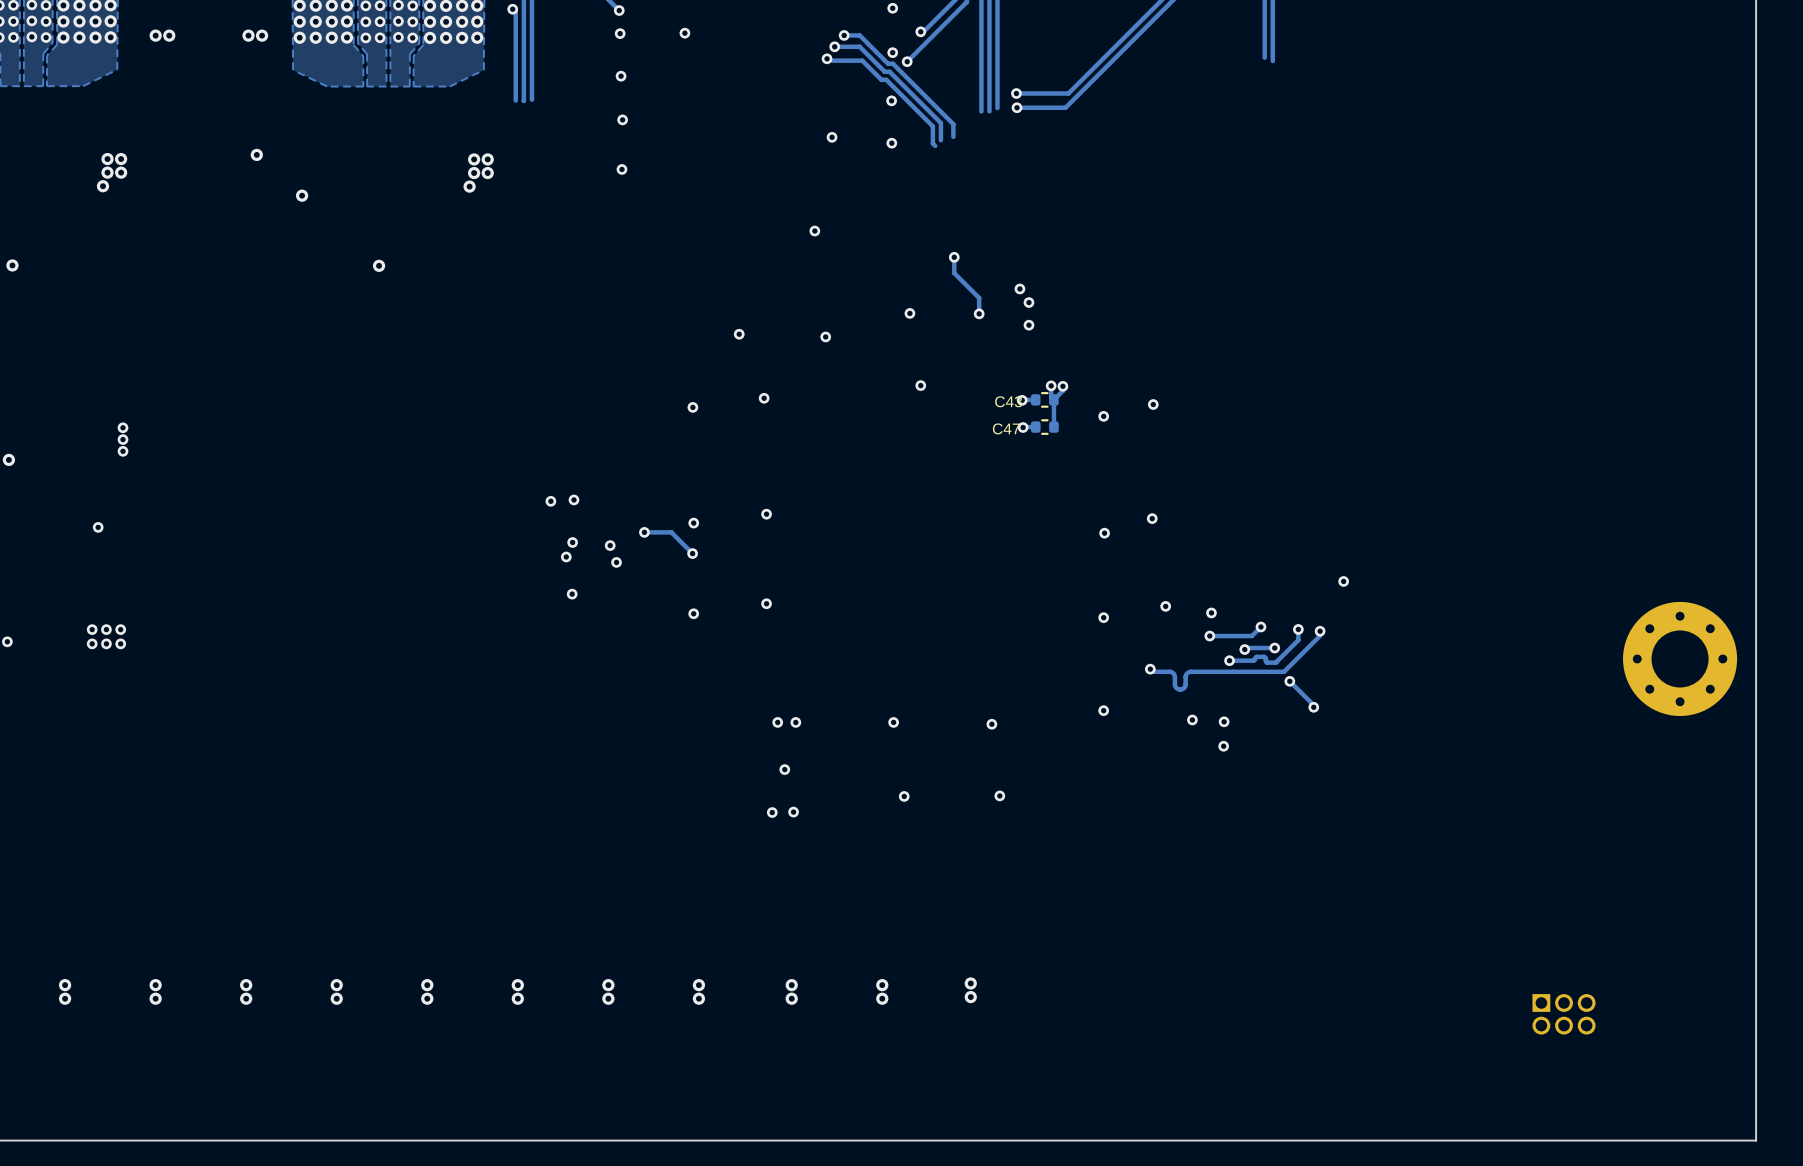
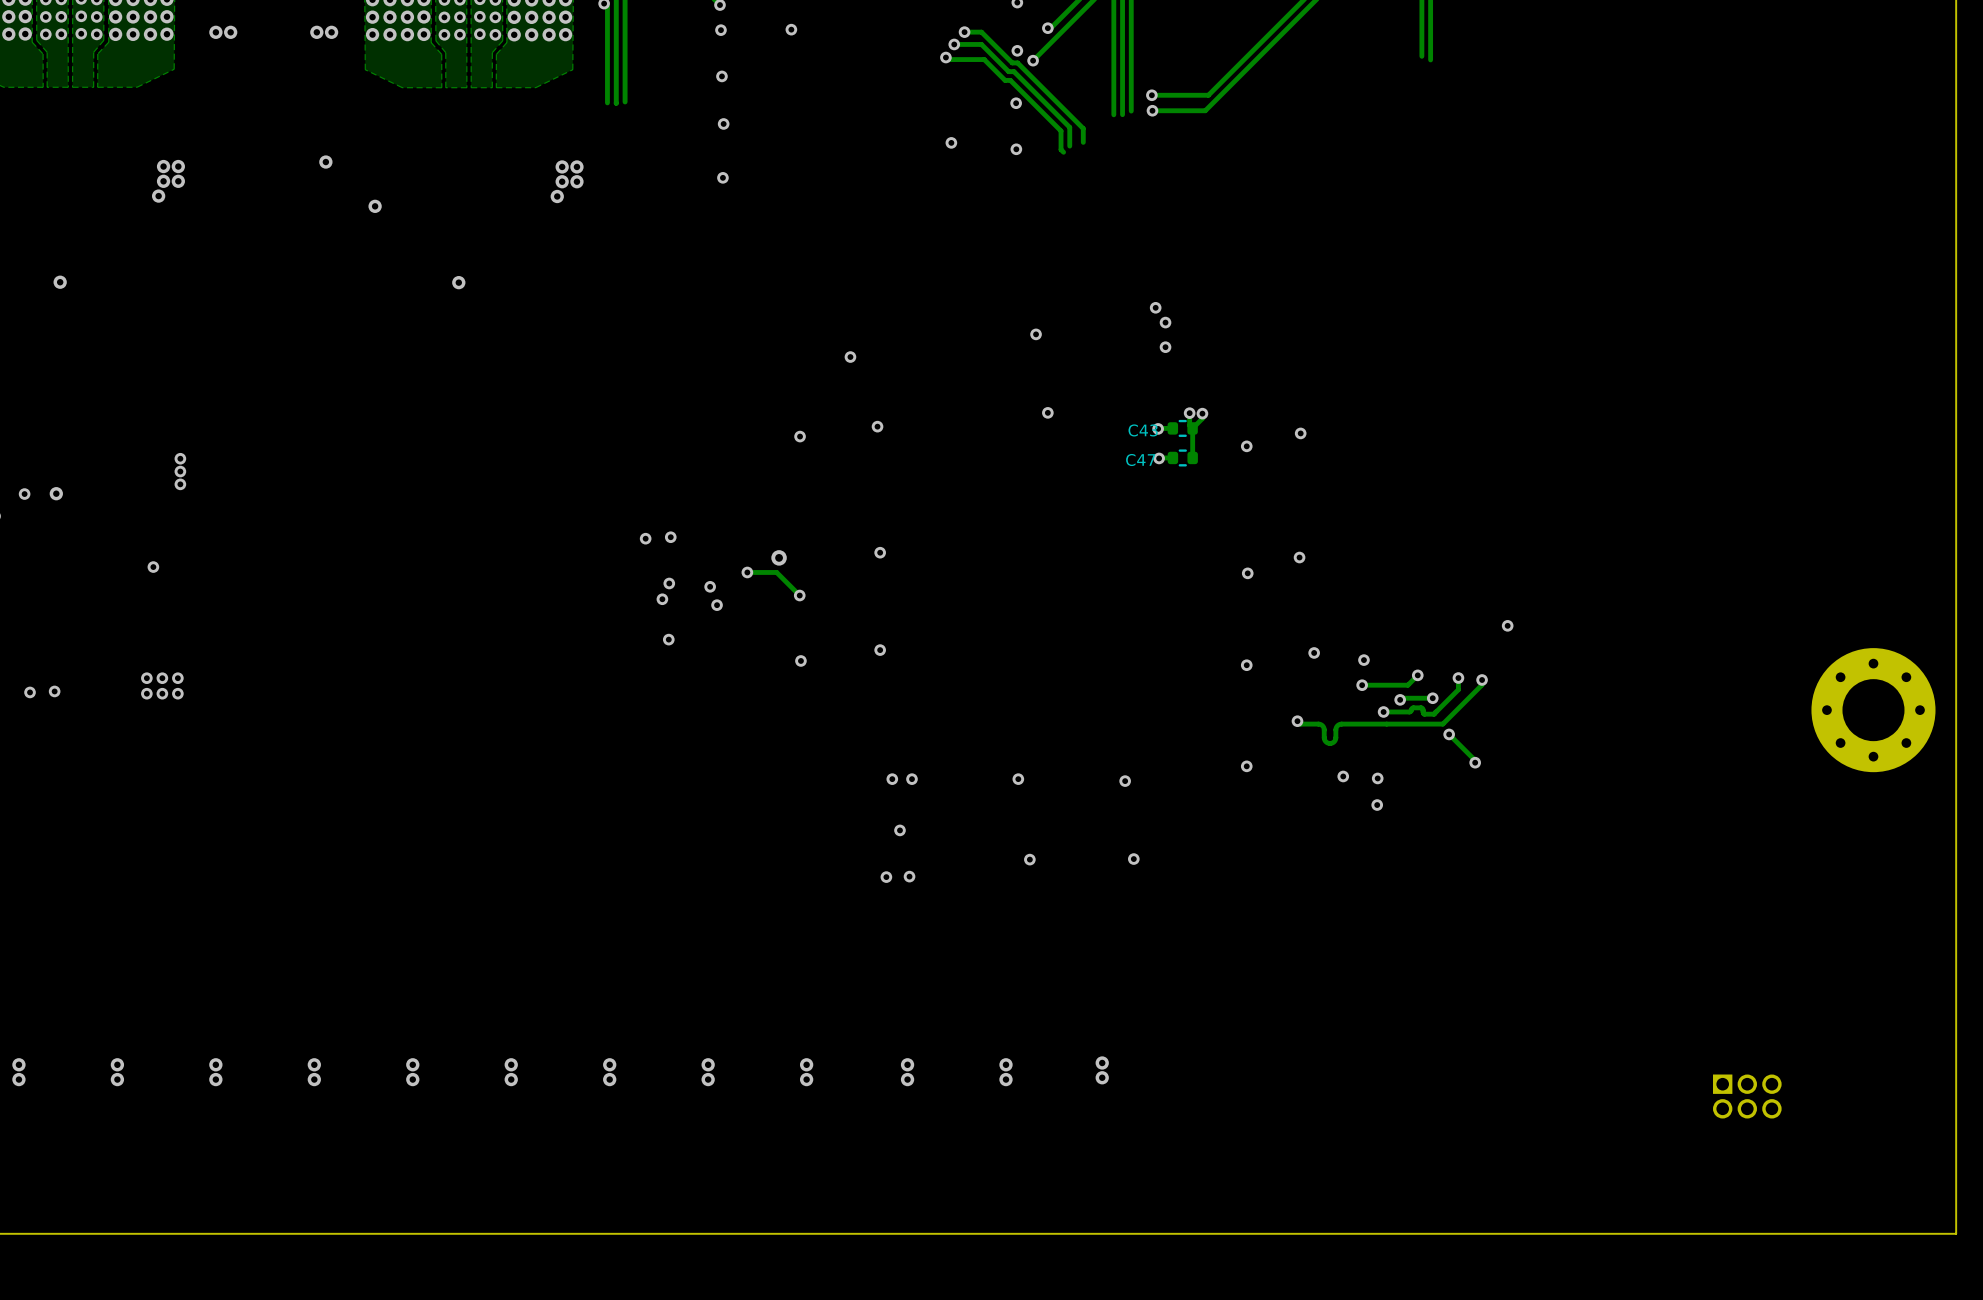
via: (814, 231) -> none
track: (954, 257) (954, 273) (979, 298) (979, 313) -> none
via: (954, 257) -> none
via: (979, 313) -> none
via: (825, 336) -> none
via: none -> (779, 557)
via: (693, 523) -> none

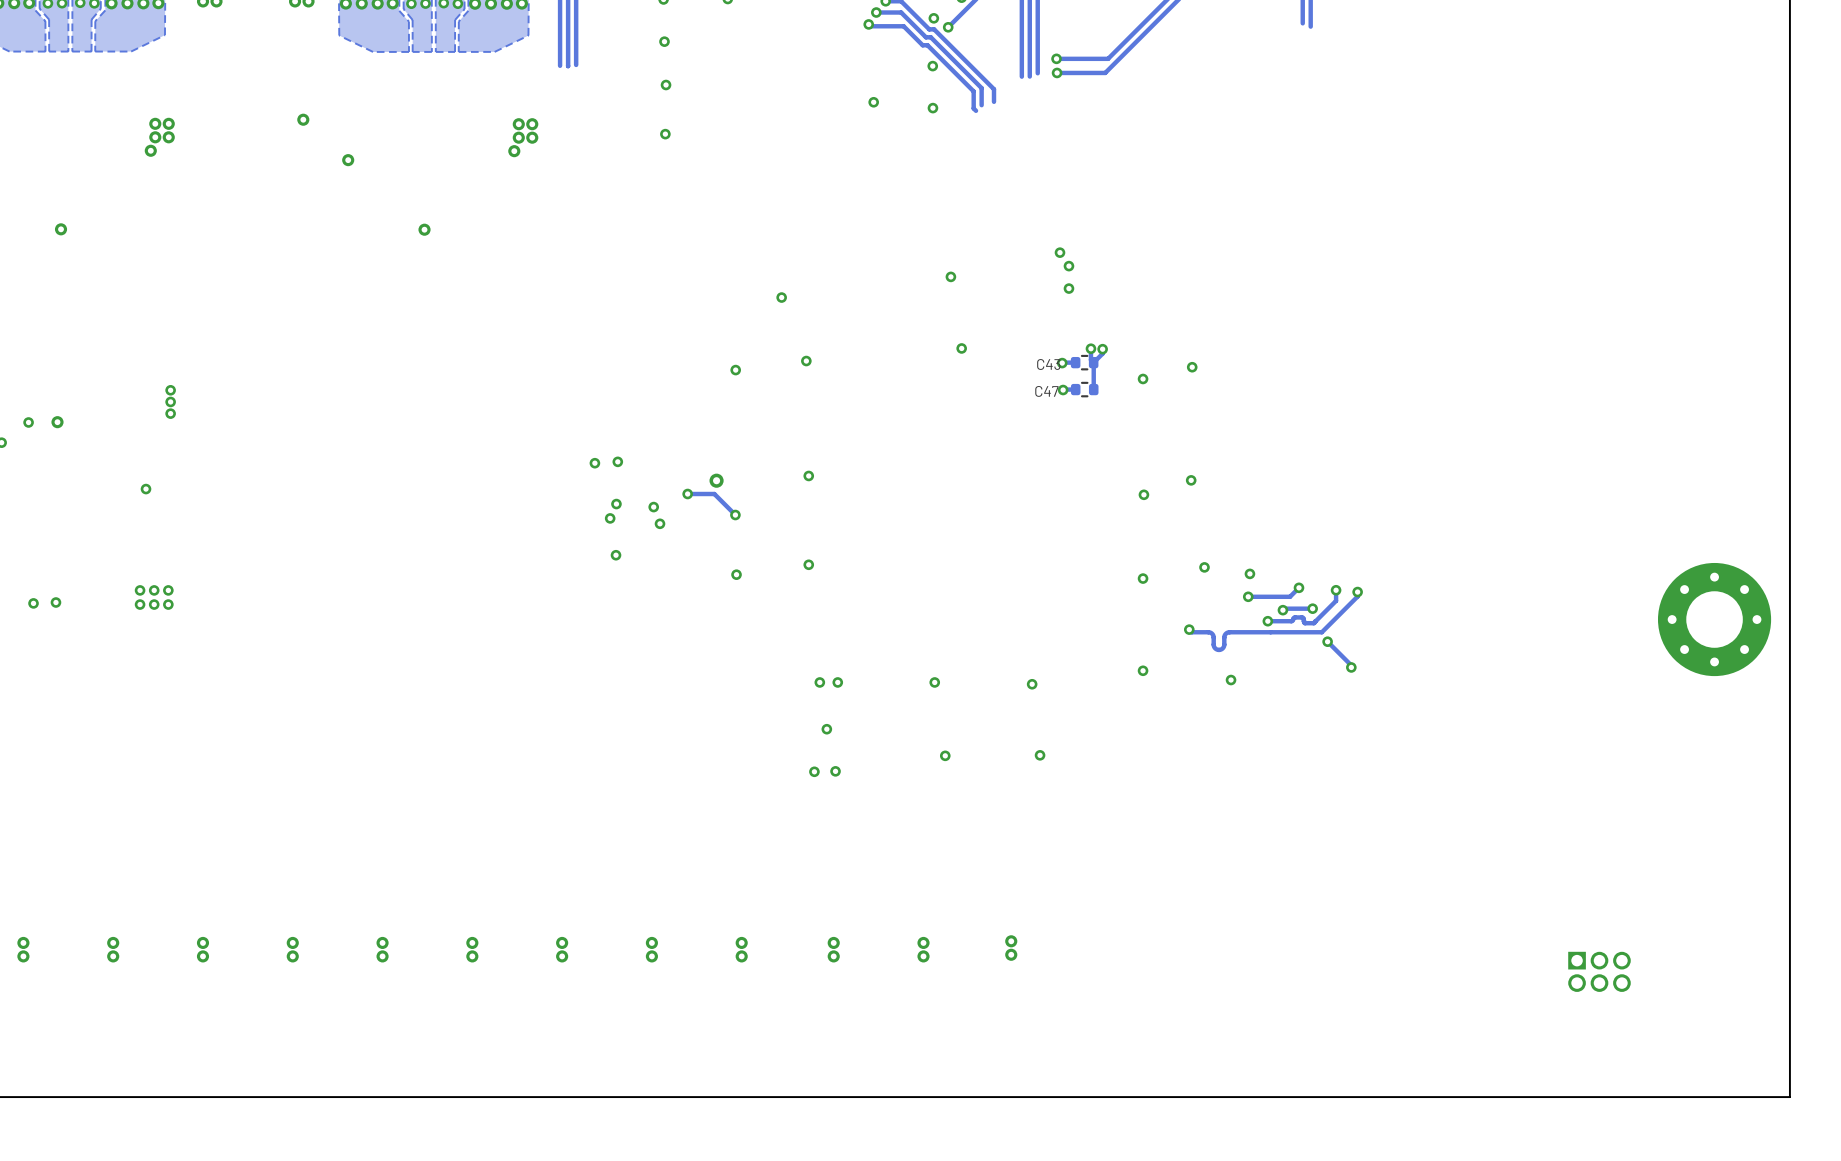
via: (1507, 625) -> none
via: (1377, 778) -> none
via: (1377, 805) -> none

